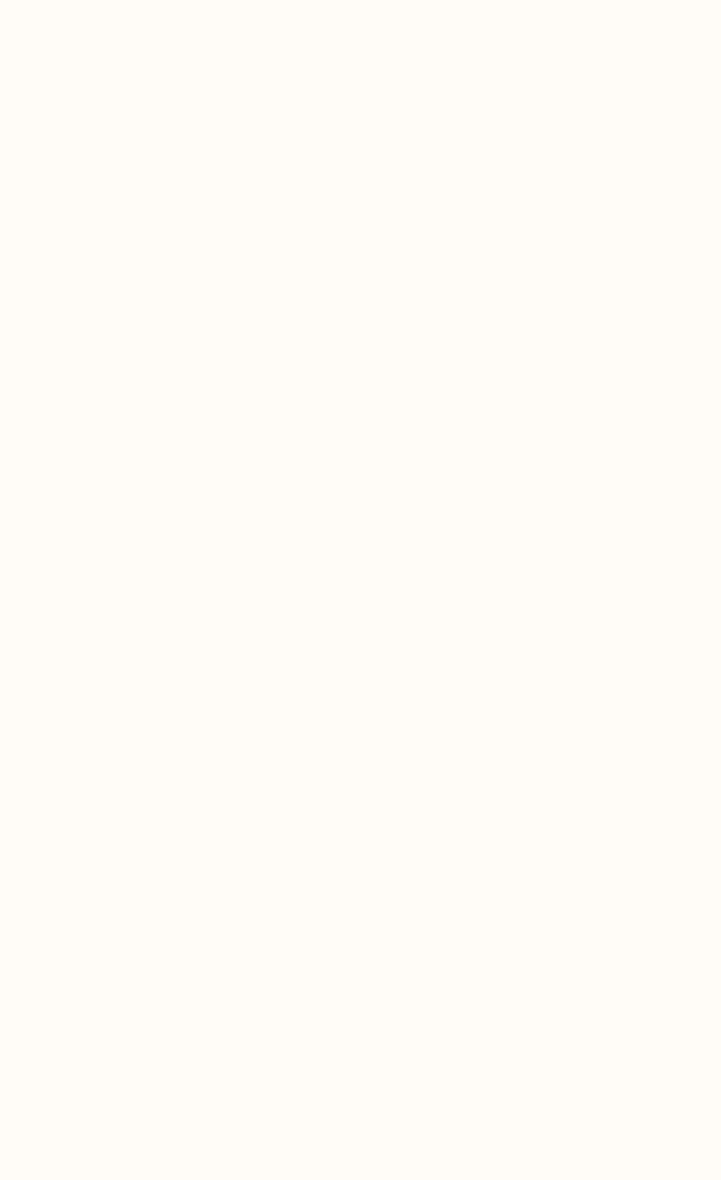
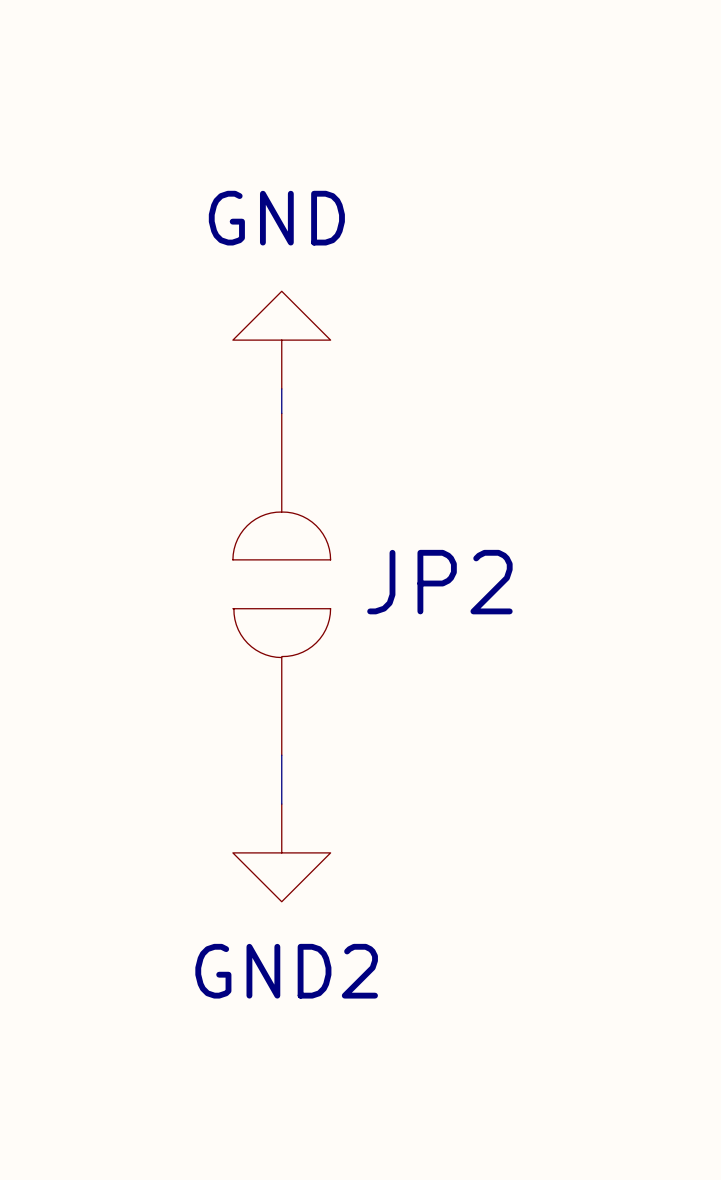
power symbol: none -> GND (281, 340)
wire: none -> (281, 388) (281, 413)
JP2: none -> (281, 584)
wire: none -> (281, 755) (281, 804)
power symbol: none -> GND2 (281, 852)

